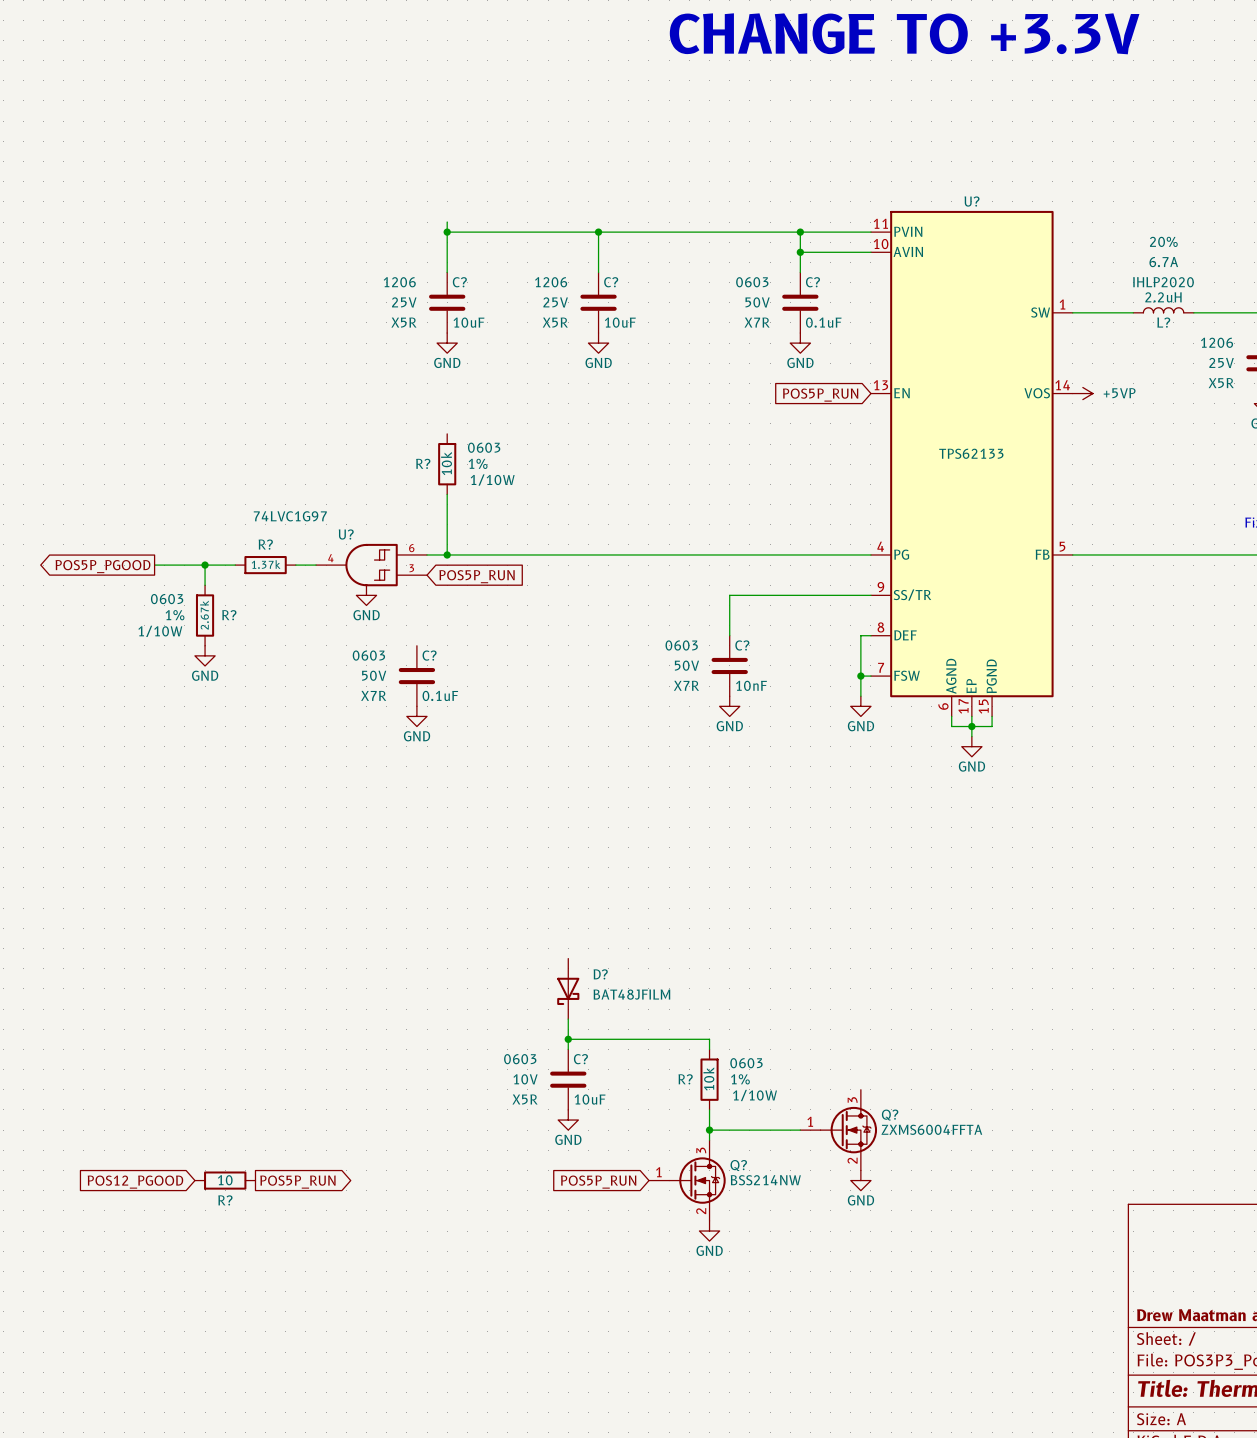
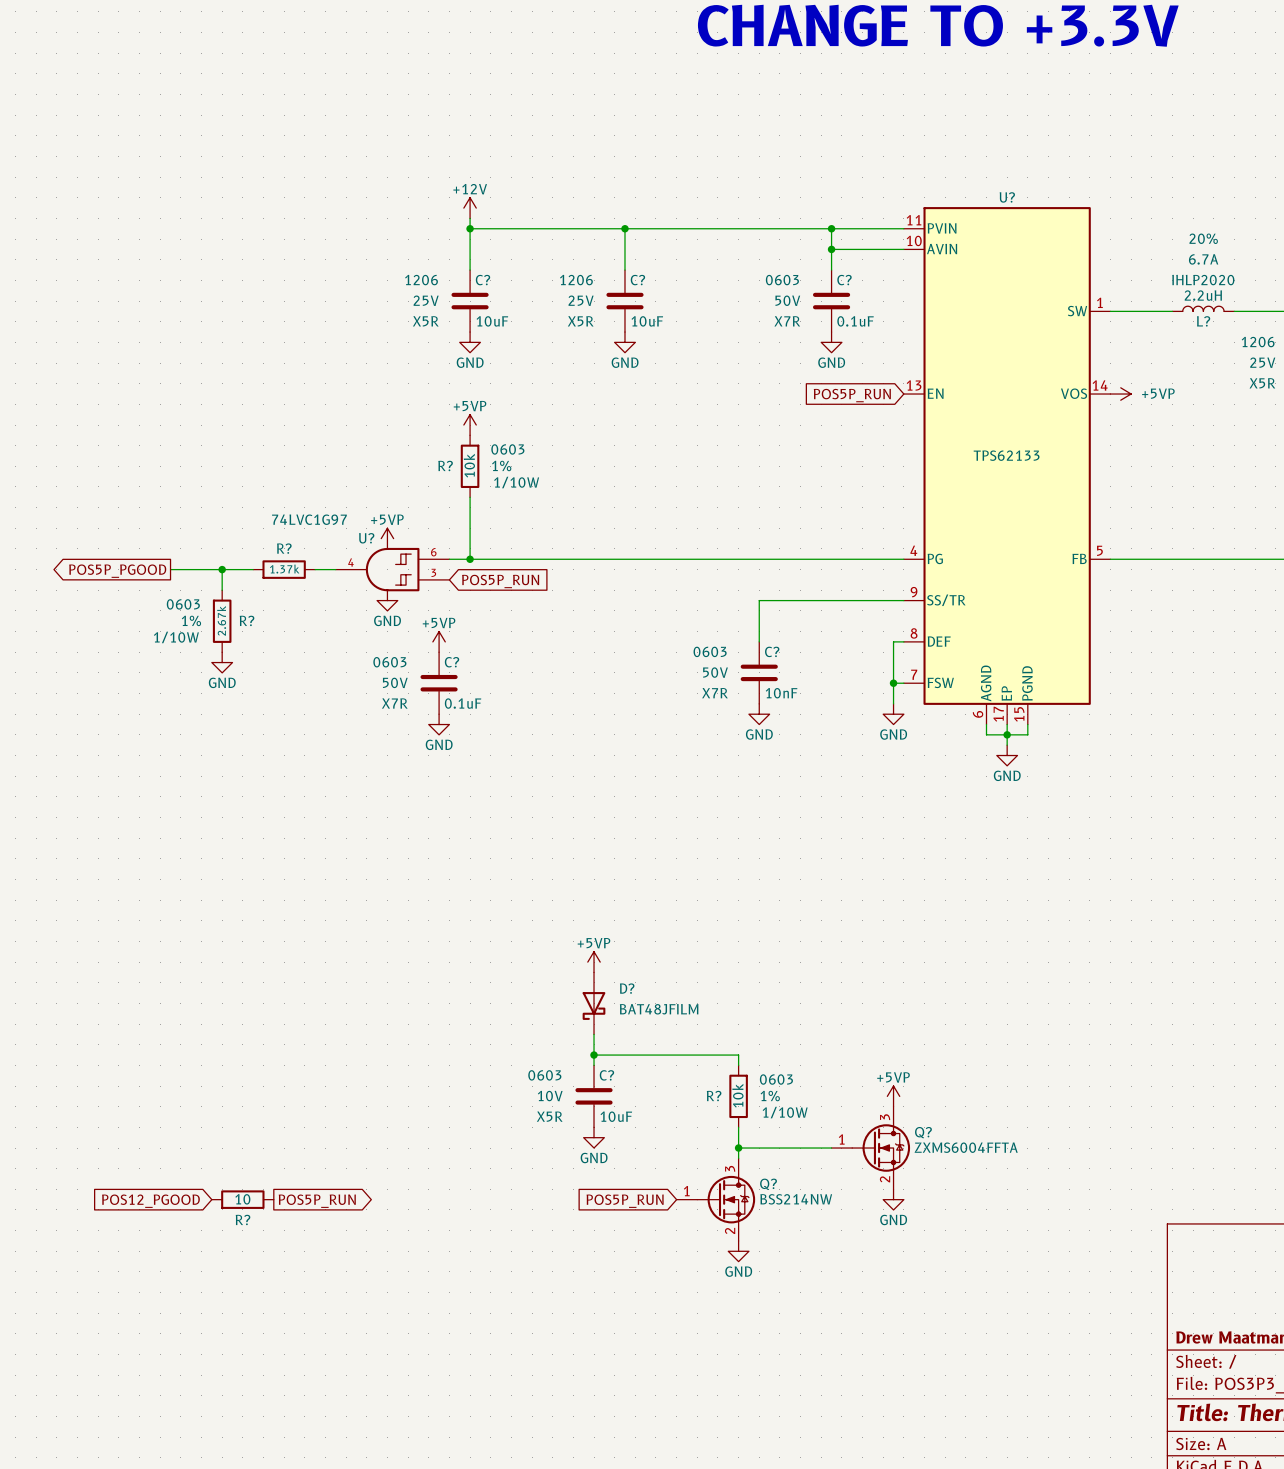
power symbol: none -> +12V (470, 208)
power symbol: none -> +5VP (470, 425)
power symbol: none -> +5VP (387, 538)
power symbol: none -> +5VP (439, 641)
power symbol: none -> +5VP (594, 962)
power symbol: none -> +5VP (893, 1096)

